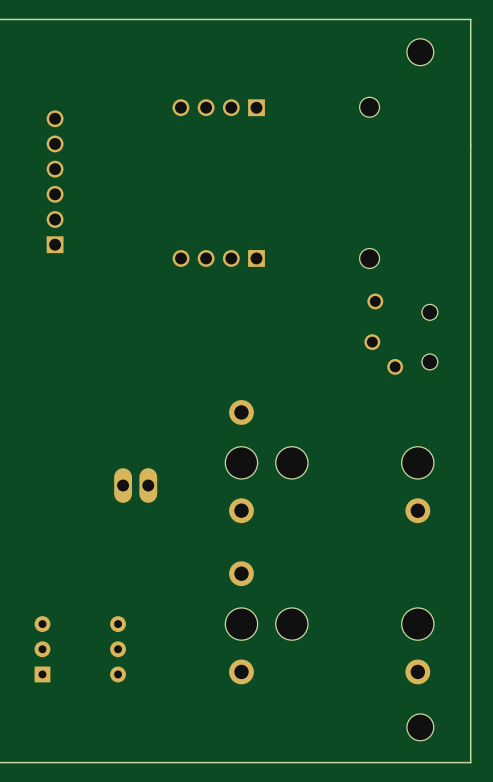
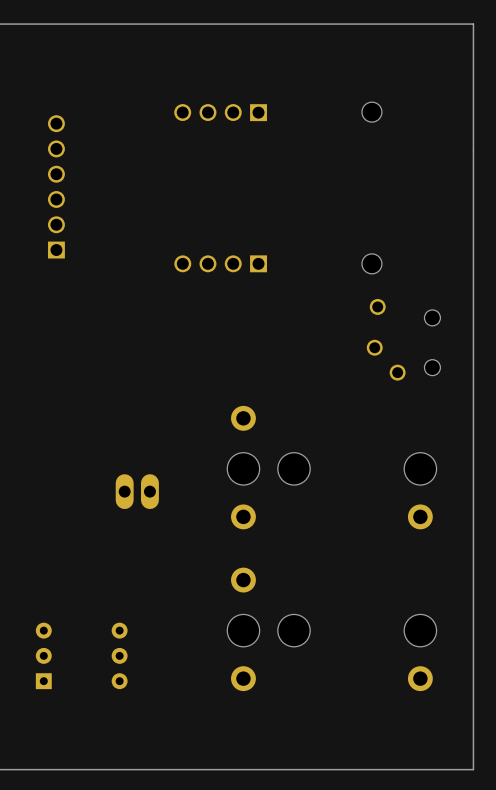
part: (420, 52) -> none
part: (420, 727) -> none

